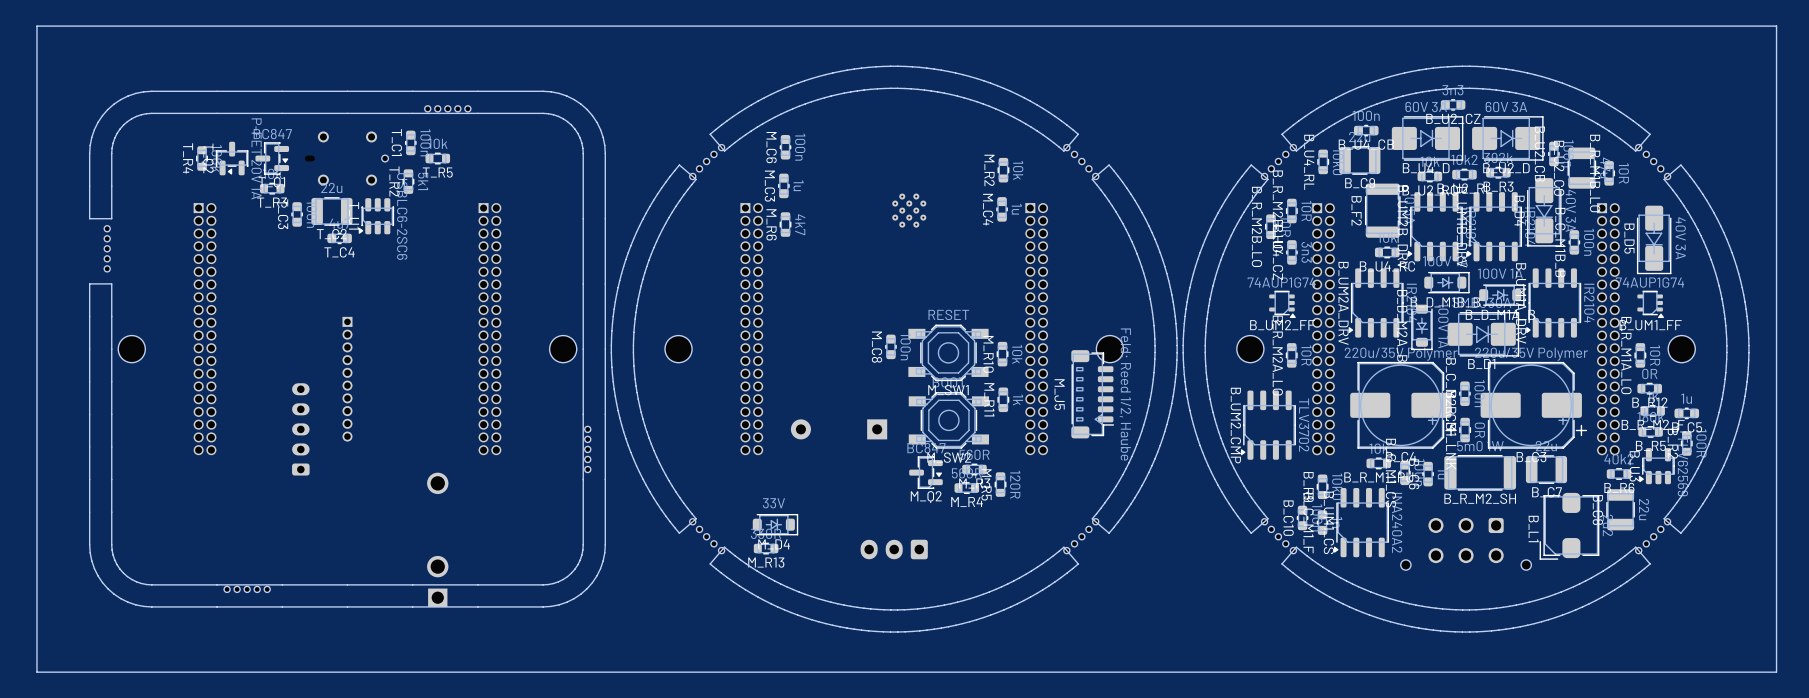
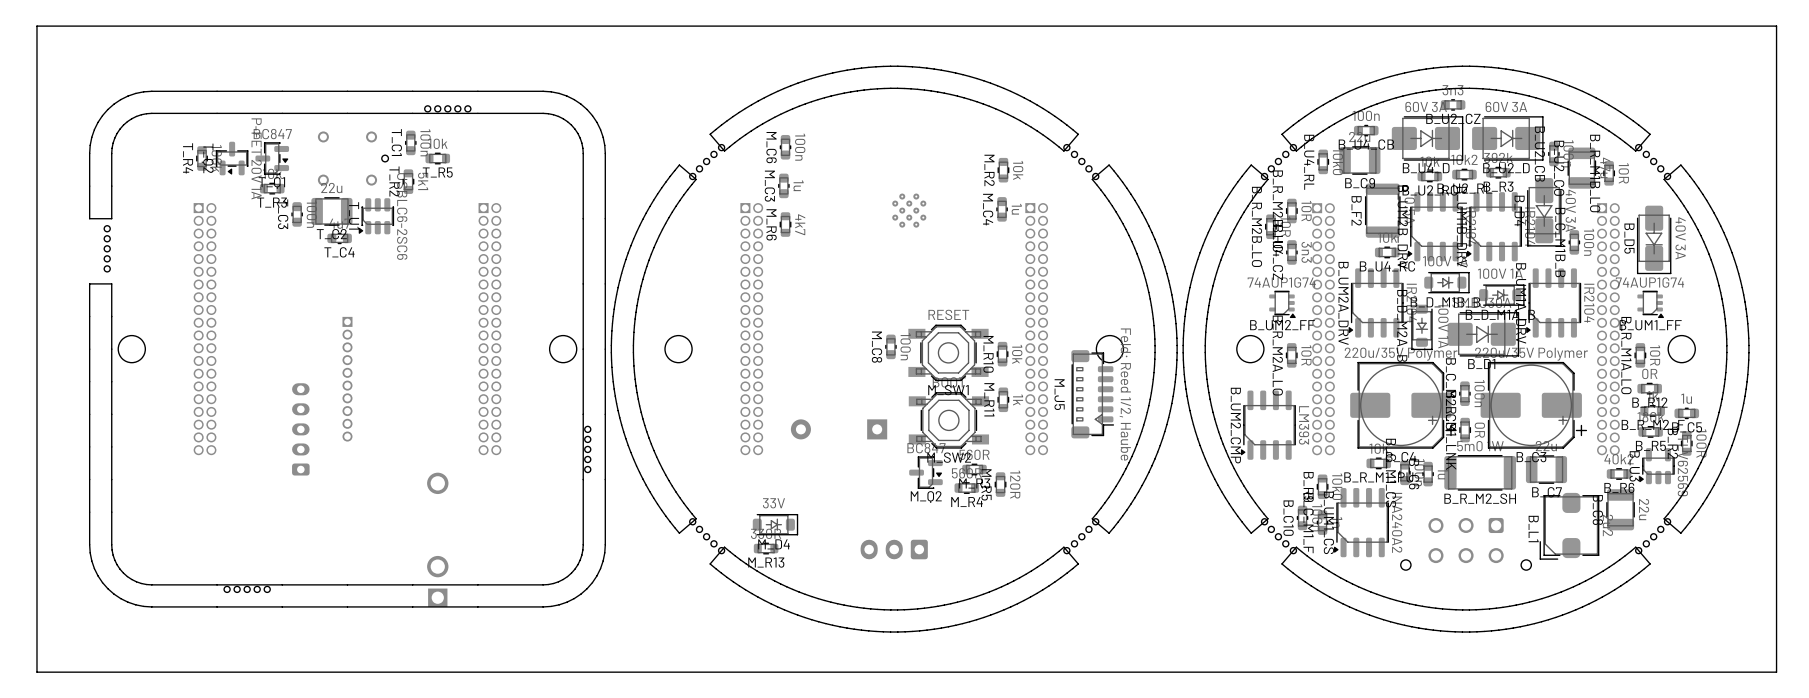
B_UM2_CMP value: TLV3702 (1304, 425) -> LM393 (1304, 425)

